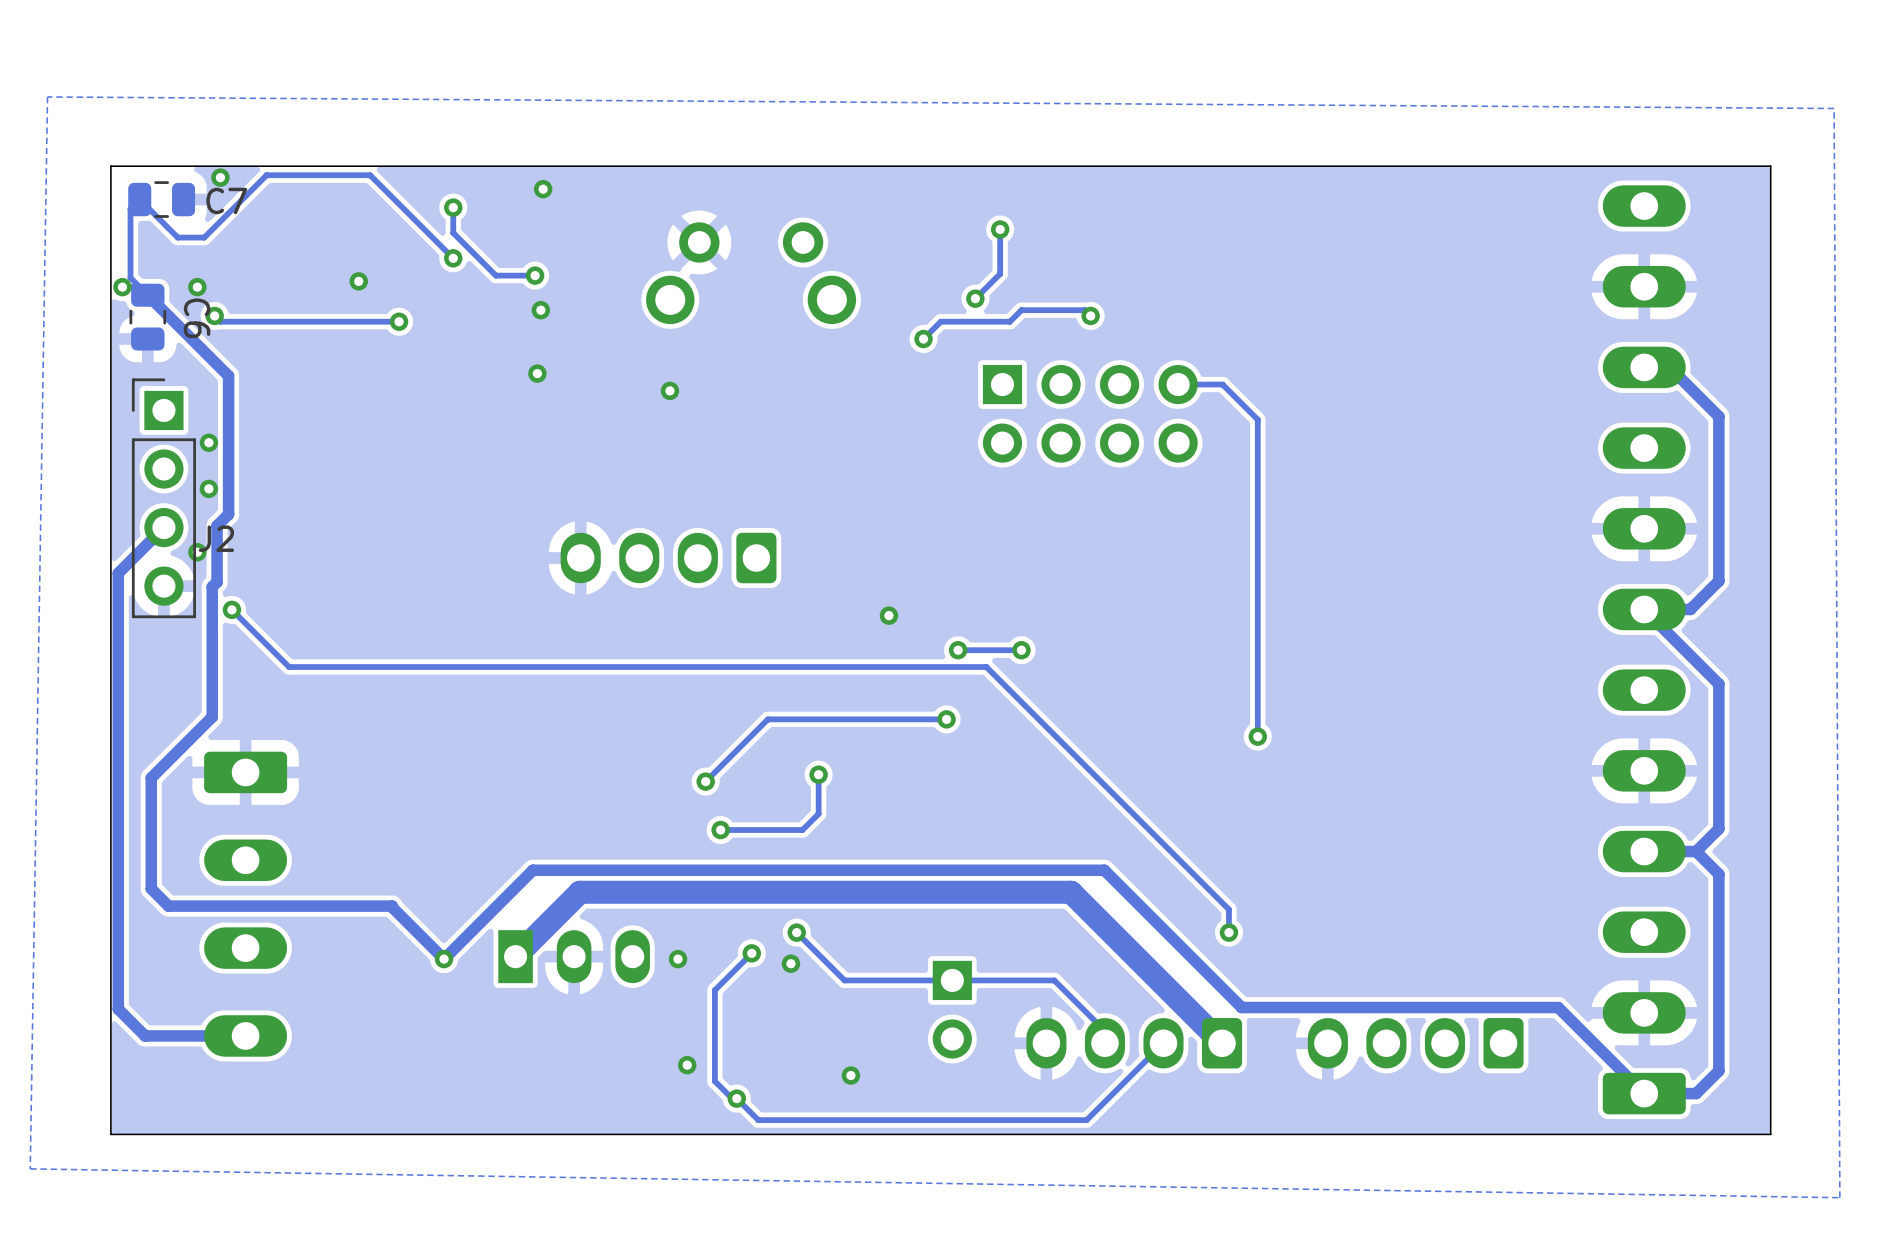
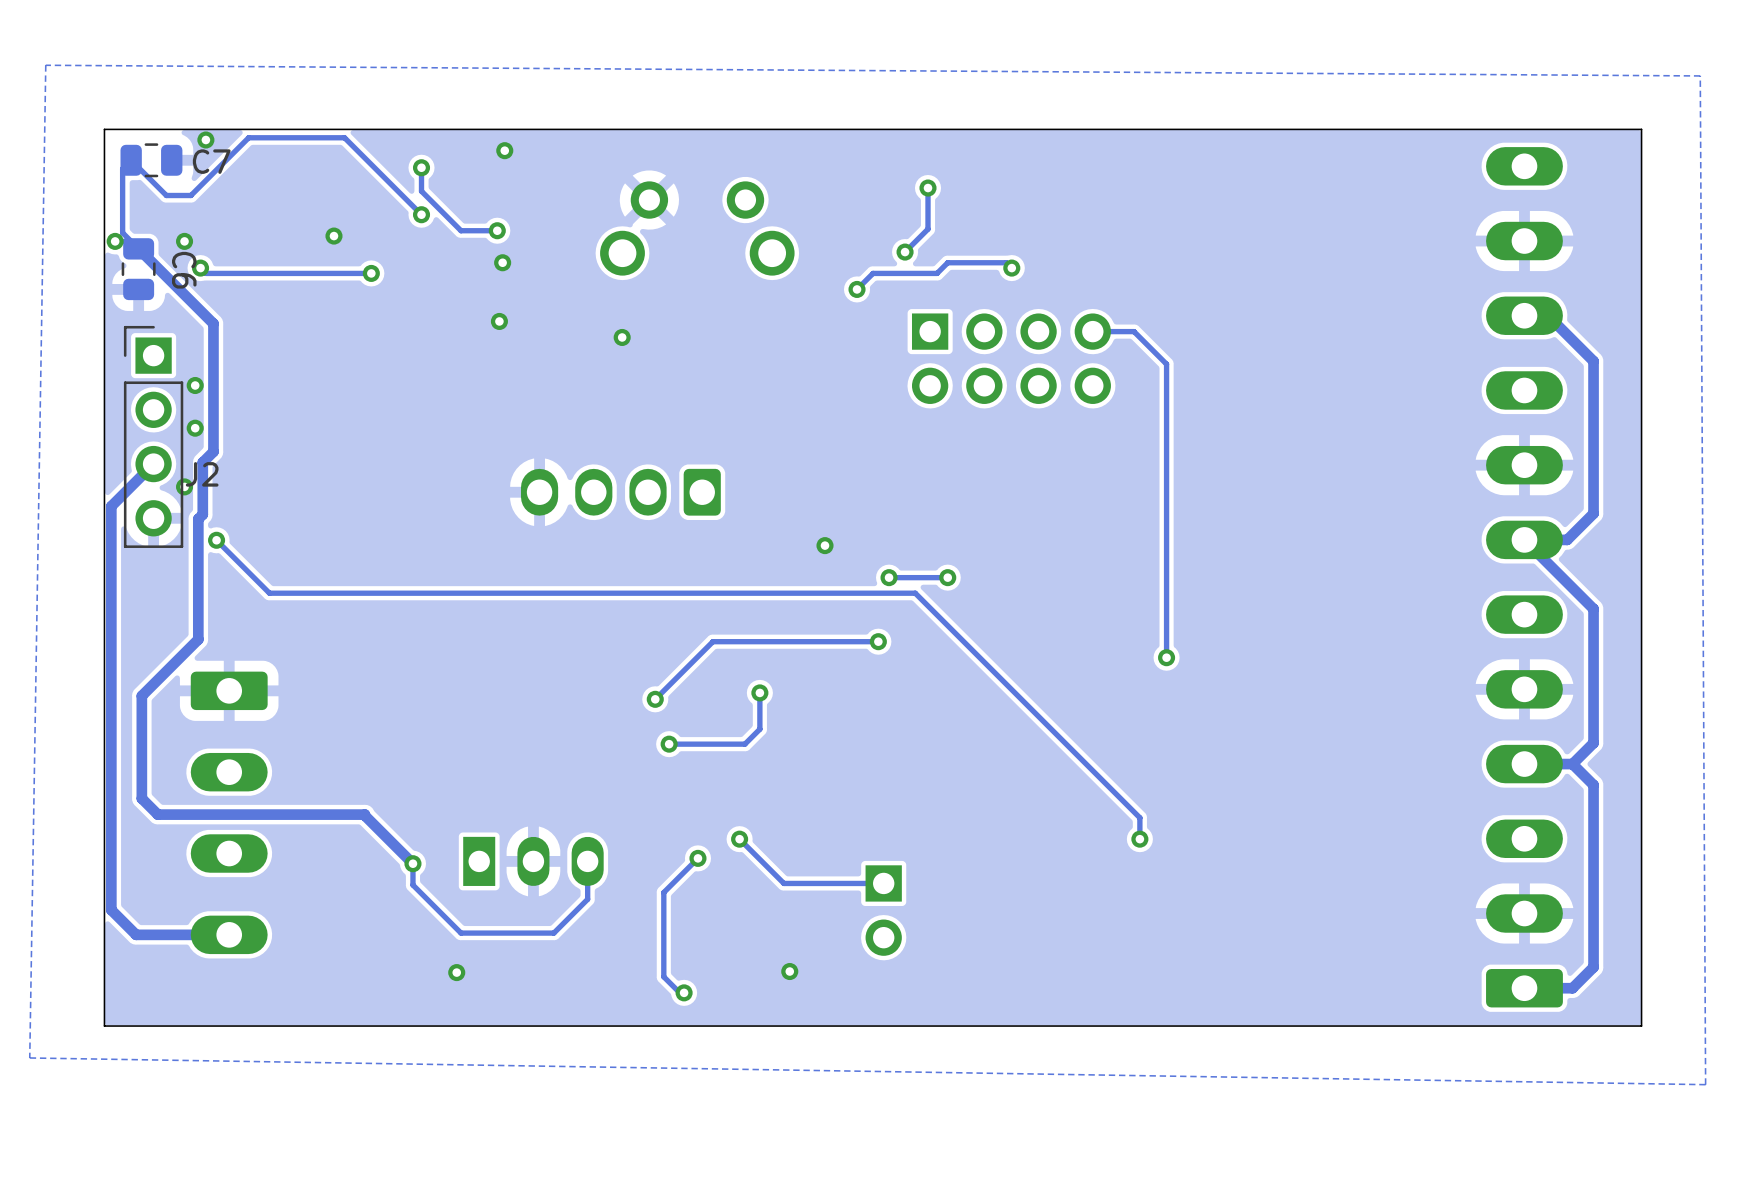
track: (515, 956) (579, 892) (1071, 892) (1222, 1043) -> none
track: (444, 959) (532, 870) (1104, 870) (1241, 1007) (1558, 1007) (1644, 1093) -> (412, 863) (412, 885) (461, 933) (553, 933) (587, 899) (587, 861)
via: (678, 959) -> none
via: (790, 963) -> none
track: (952, 980) (1054, 980) (1104, 1031) (1104, 1043) -> none
part: (1134, 1043) -> none
track: (1163, 1043) (1086, 1120) (758, 1120) (736, 1098) -> none
part: (1415, 1043) -> none
via: (687, 1065) -> none
via: none -> (456, 972)

